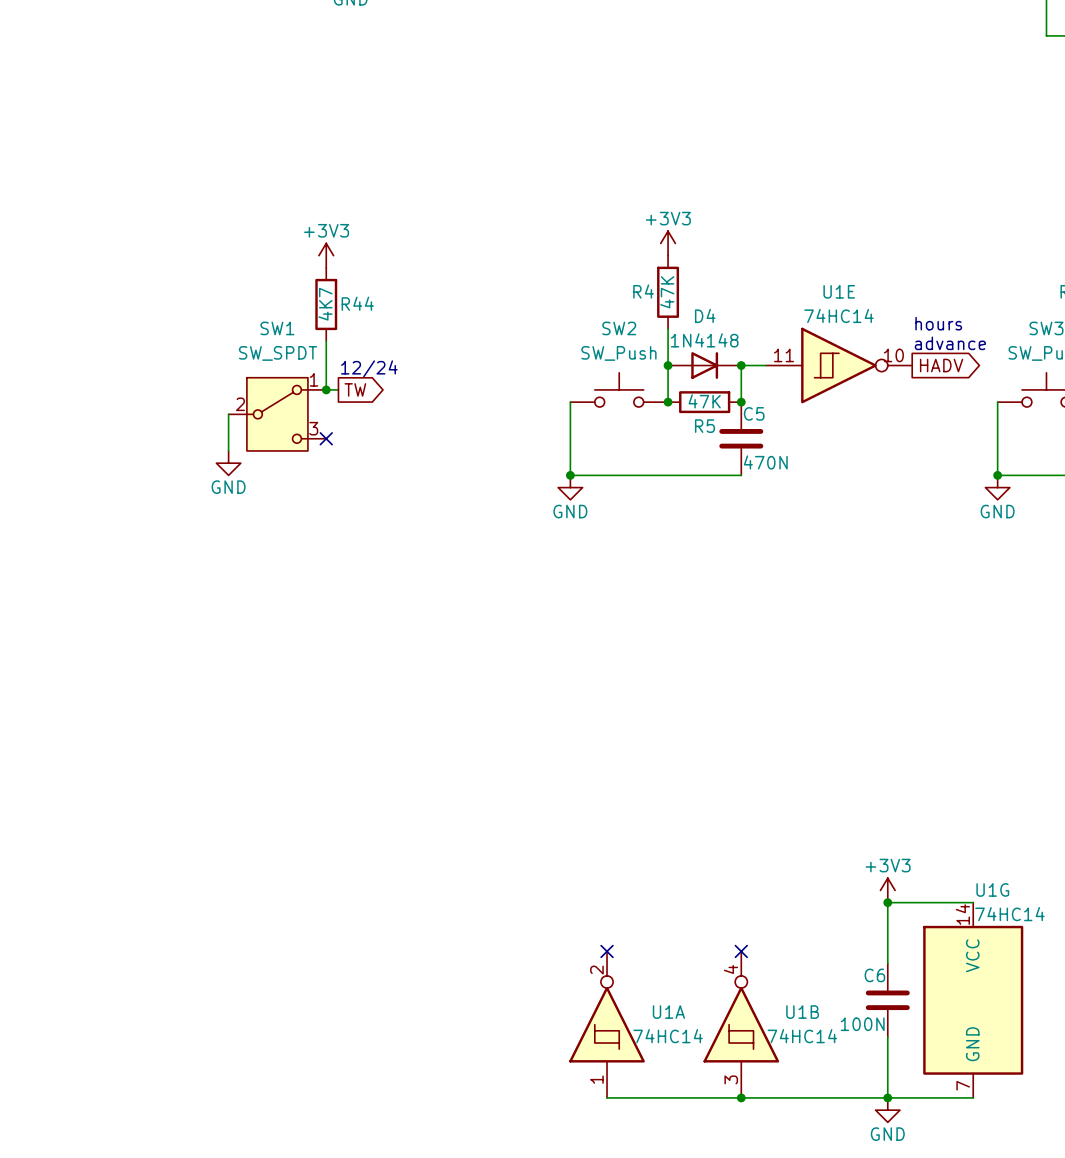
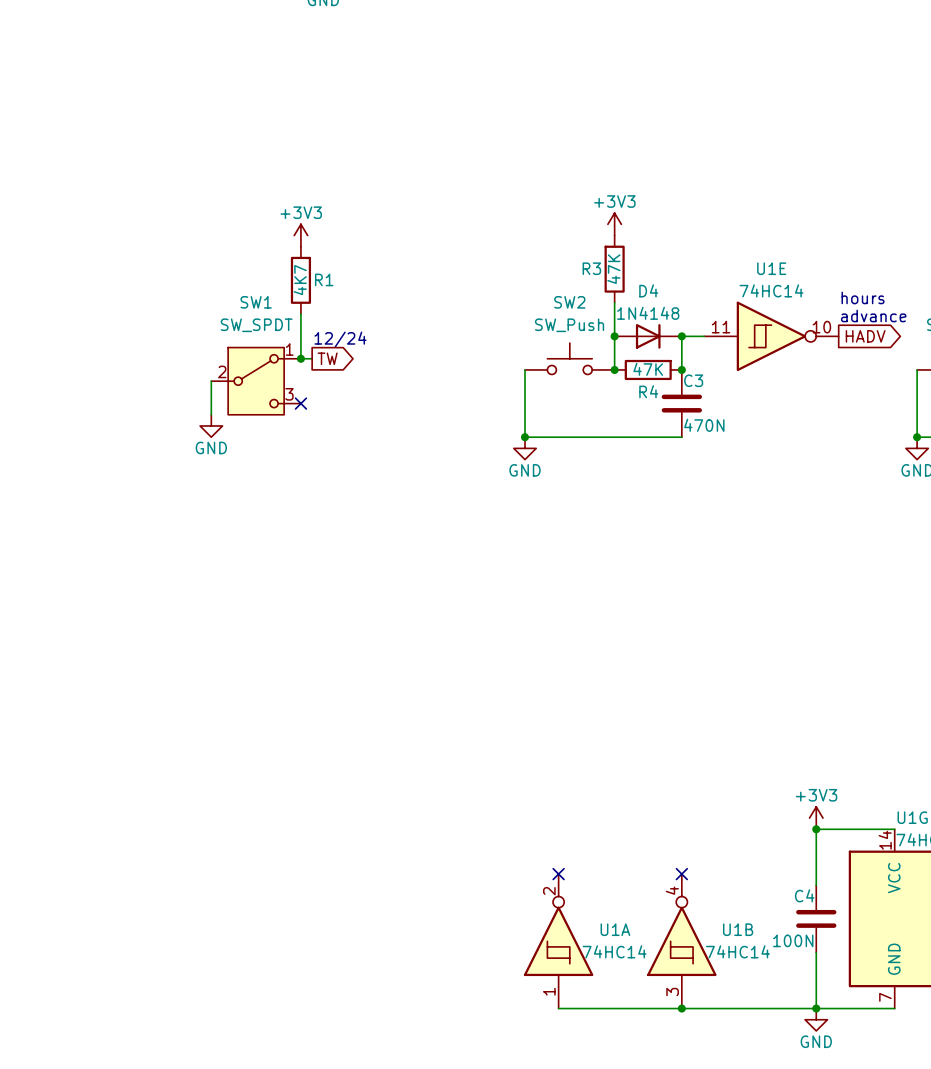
R4 name: R4 (643, 291) -> R3 (591, 268)
R44 name: R44 (357, 303) -> R1 (324, 279)
C5 name: C5 (754, 413) -> C3 (693, 380)
R5 name: R5 (704, 426) -> R4 (648, 391)
C6 name: C6 (874, 975) -> C4 (804, 895)

